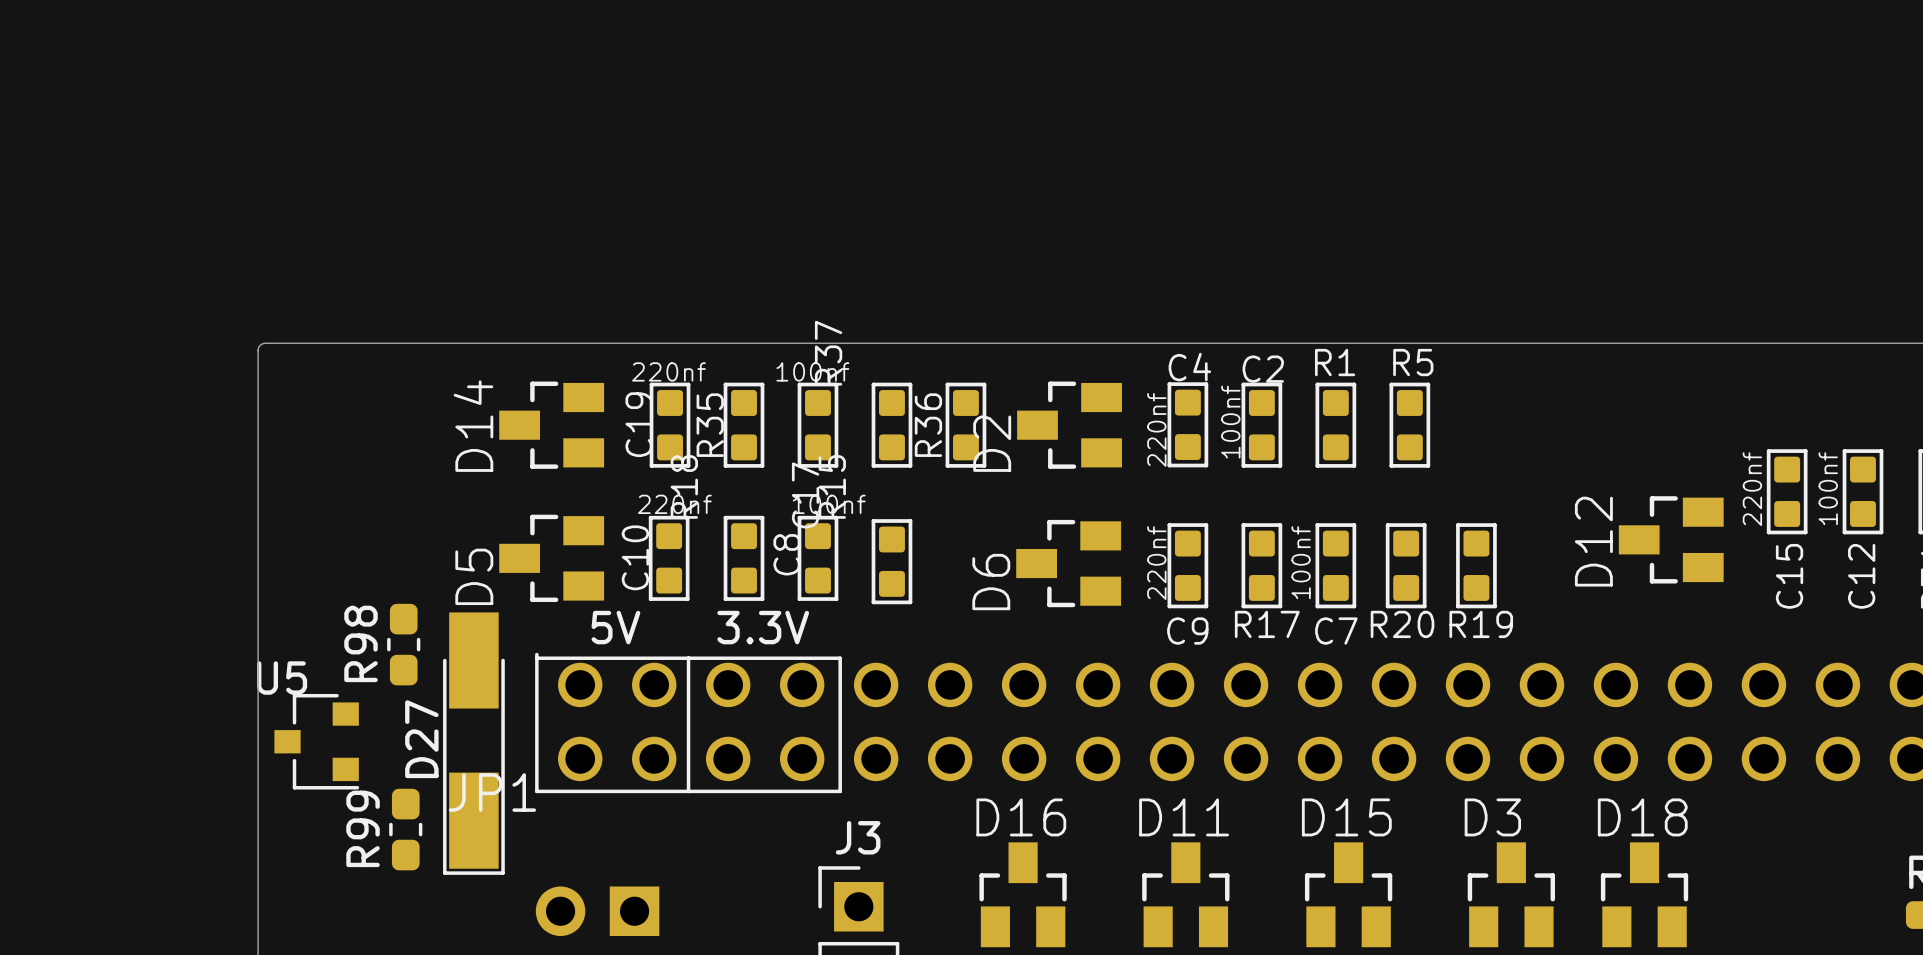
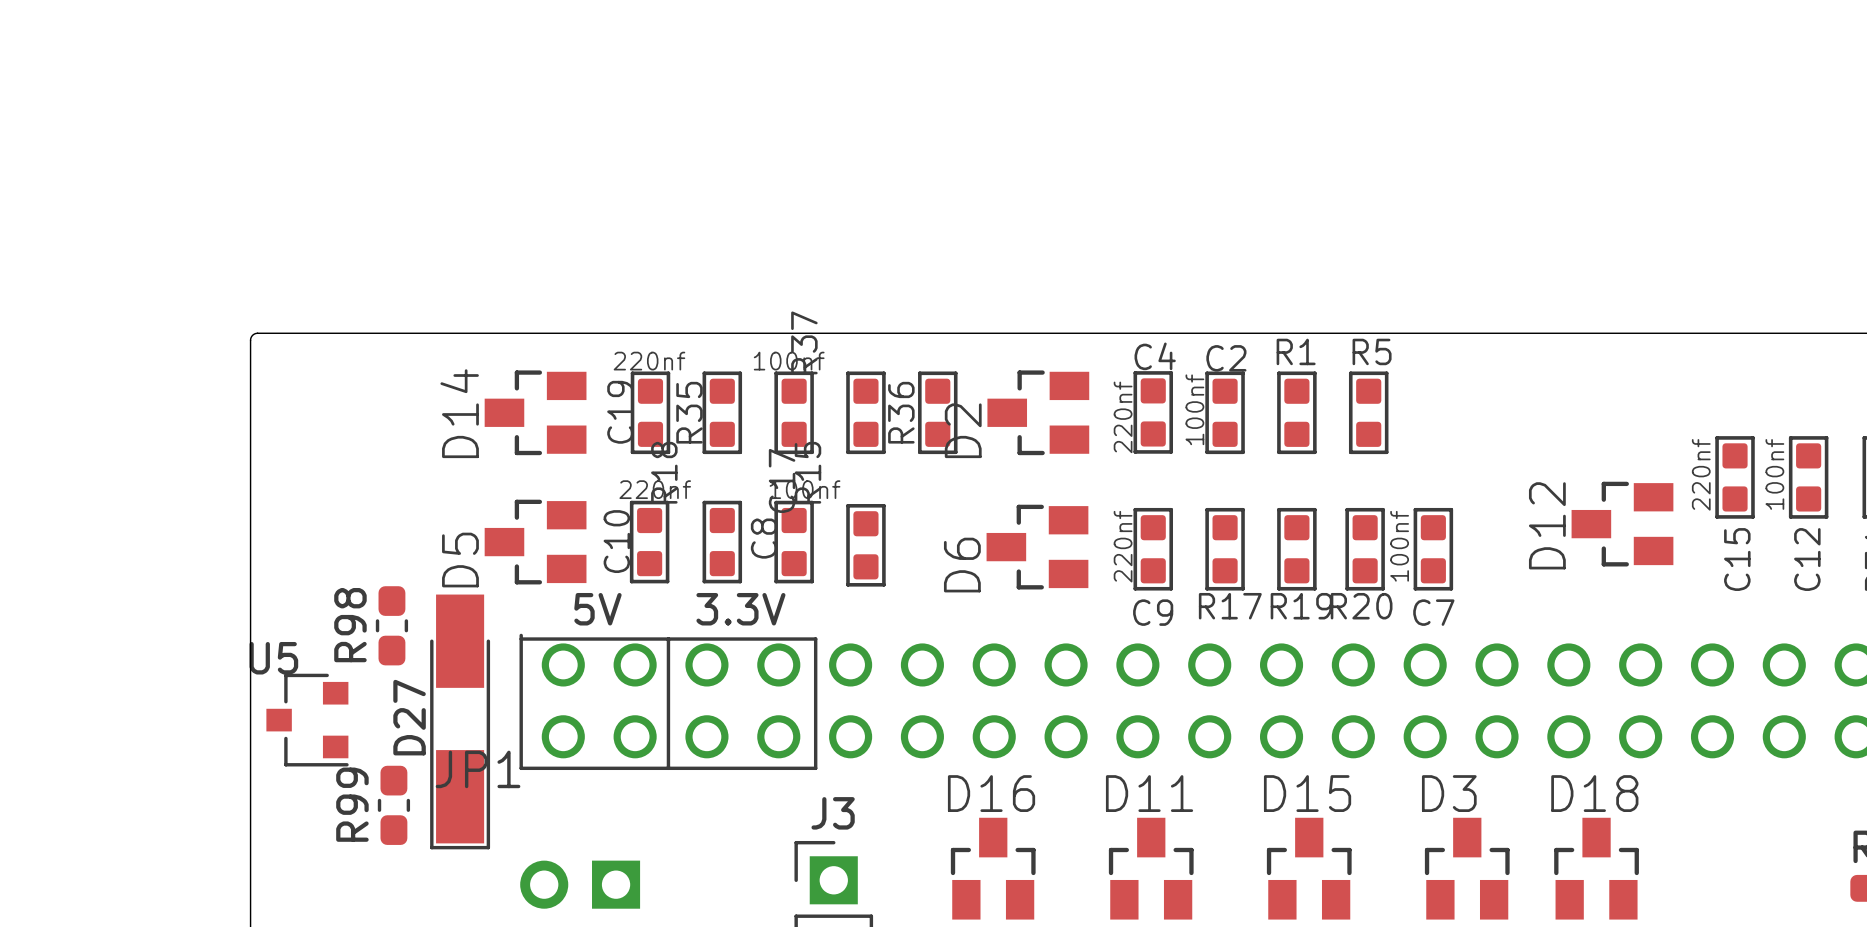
C7 value: 100nf (1301, 562) -> none
R19 value: none -> 100nf (1399, 546)
R19 name: R19 (1481, 624) -> C7 (1433, 612)
C7 name: C7 (1336, 631) -> R19 (1301, 606)

